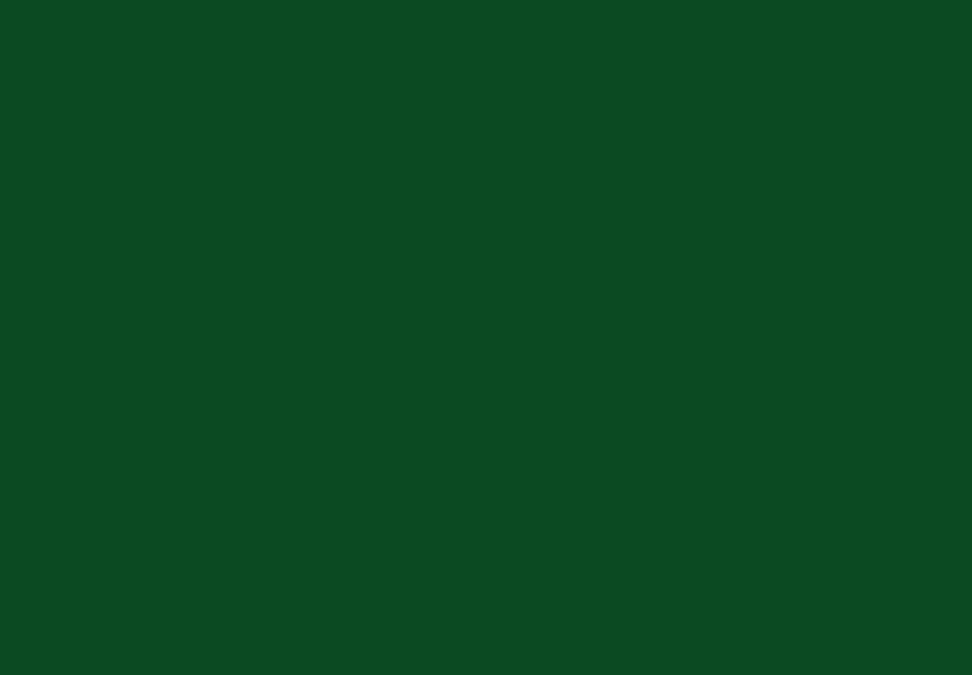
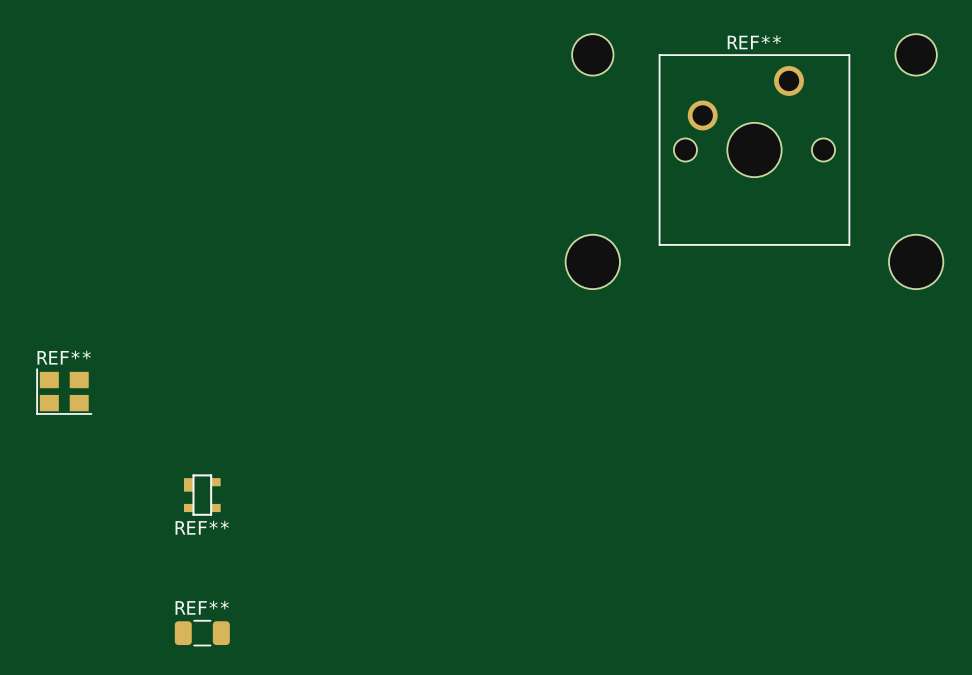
REF**: none -> (754, 161)
REF**: none -> (64, 391)
REF**: none -> (202, 495)
REF**: none -> (202, 633)

